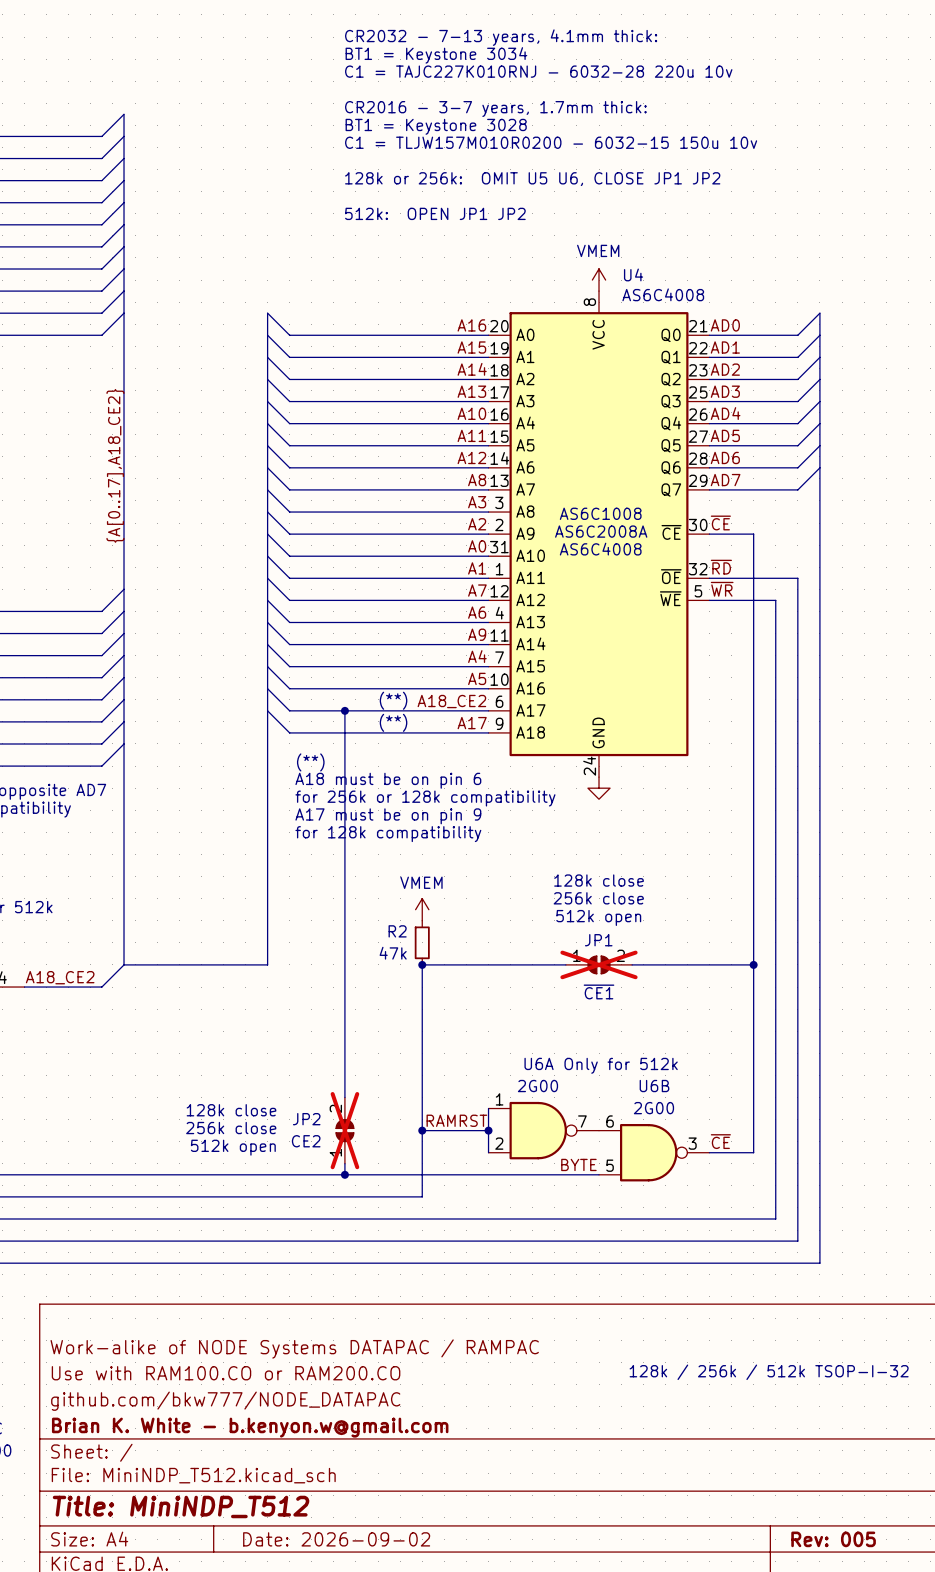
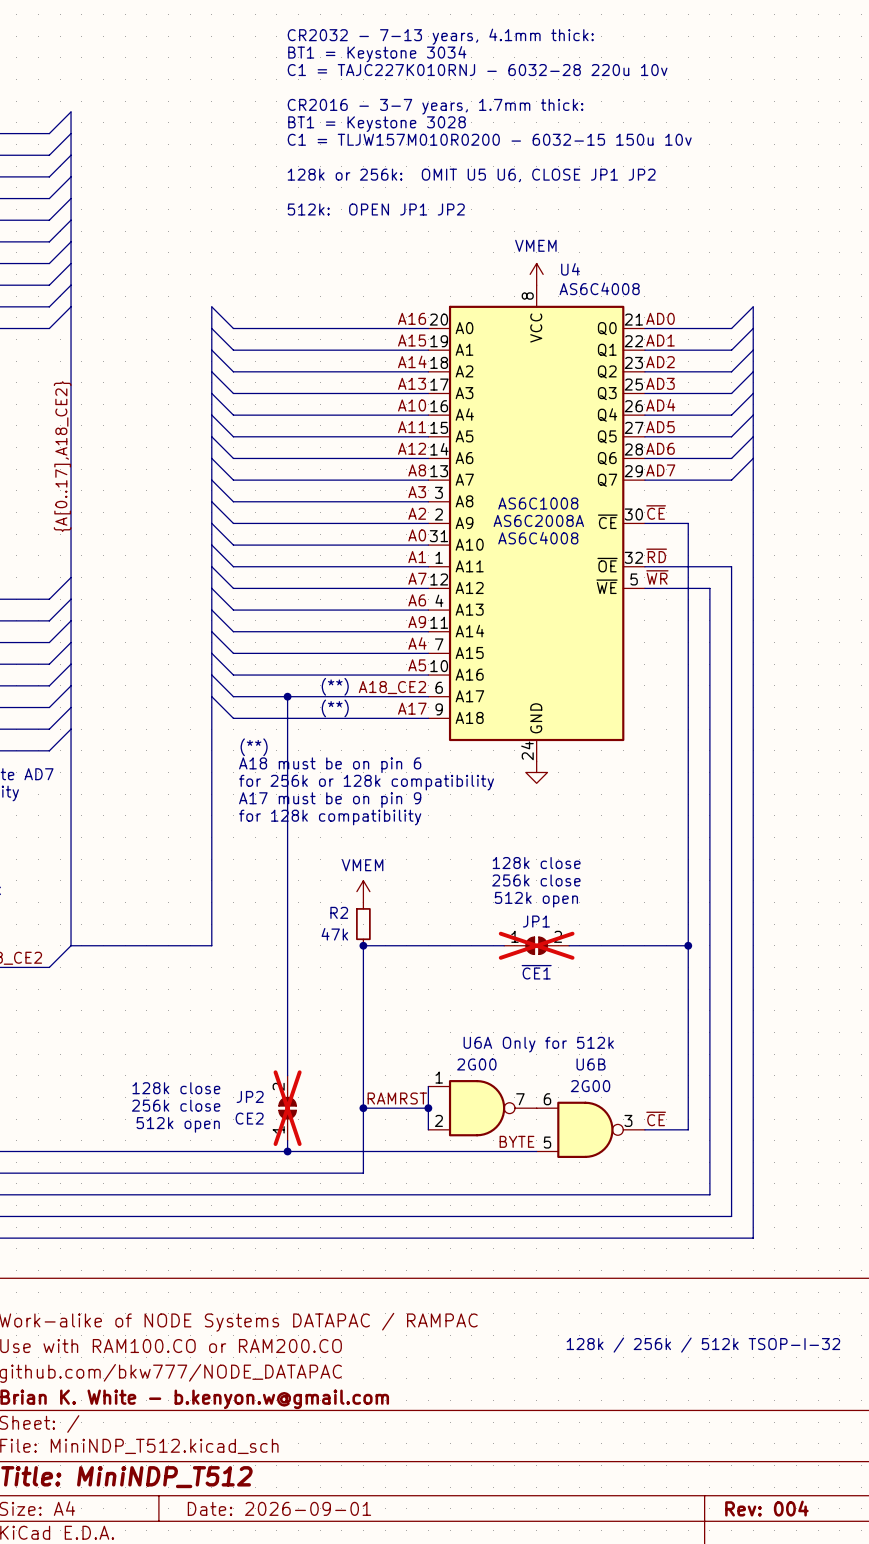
title block: Date: 2026-09-02 (336, 1539) -> Date: 2026-09-01 (279, 1508)
title block: Rev: 005 (833, 1539) -> Rev: 004 (766, 1508)

